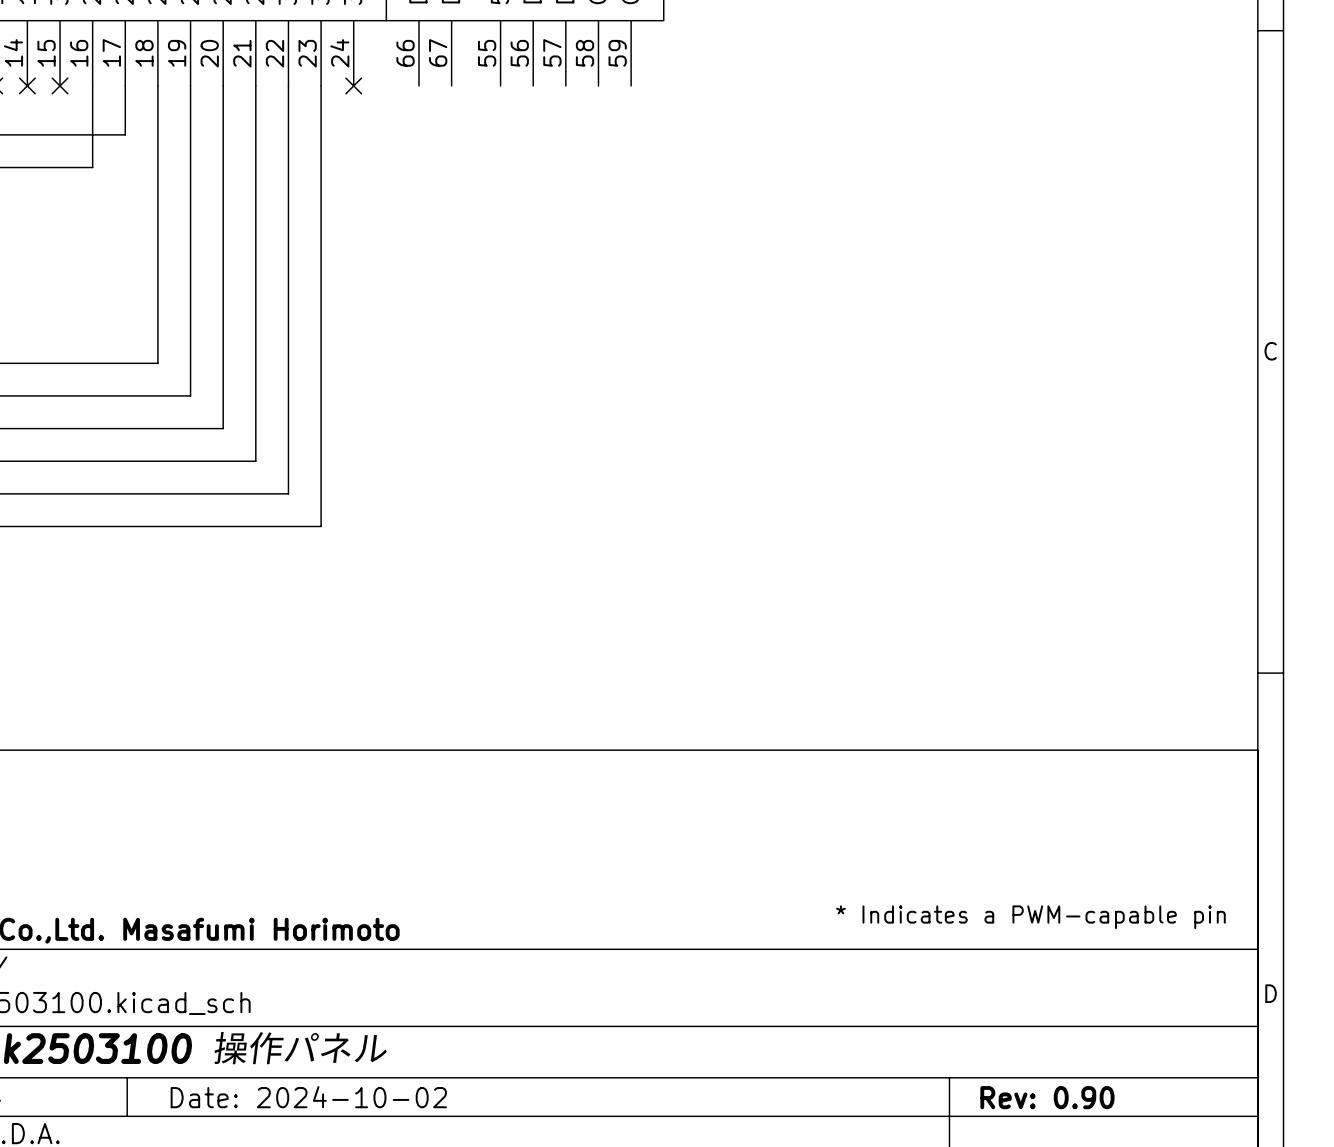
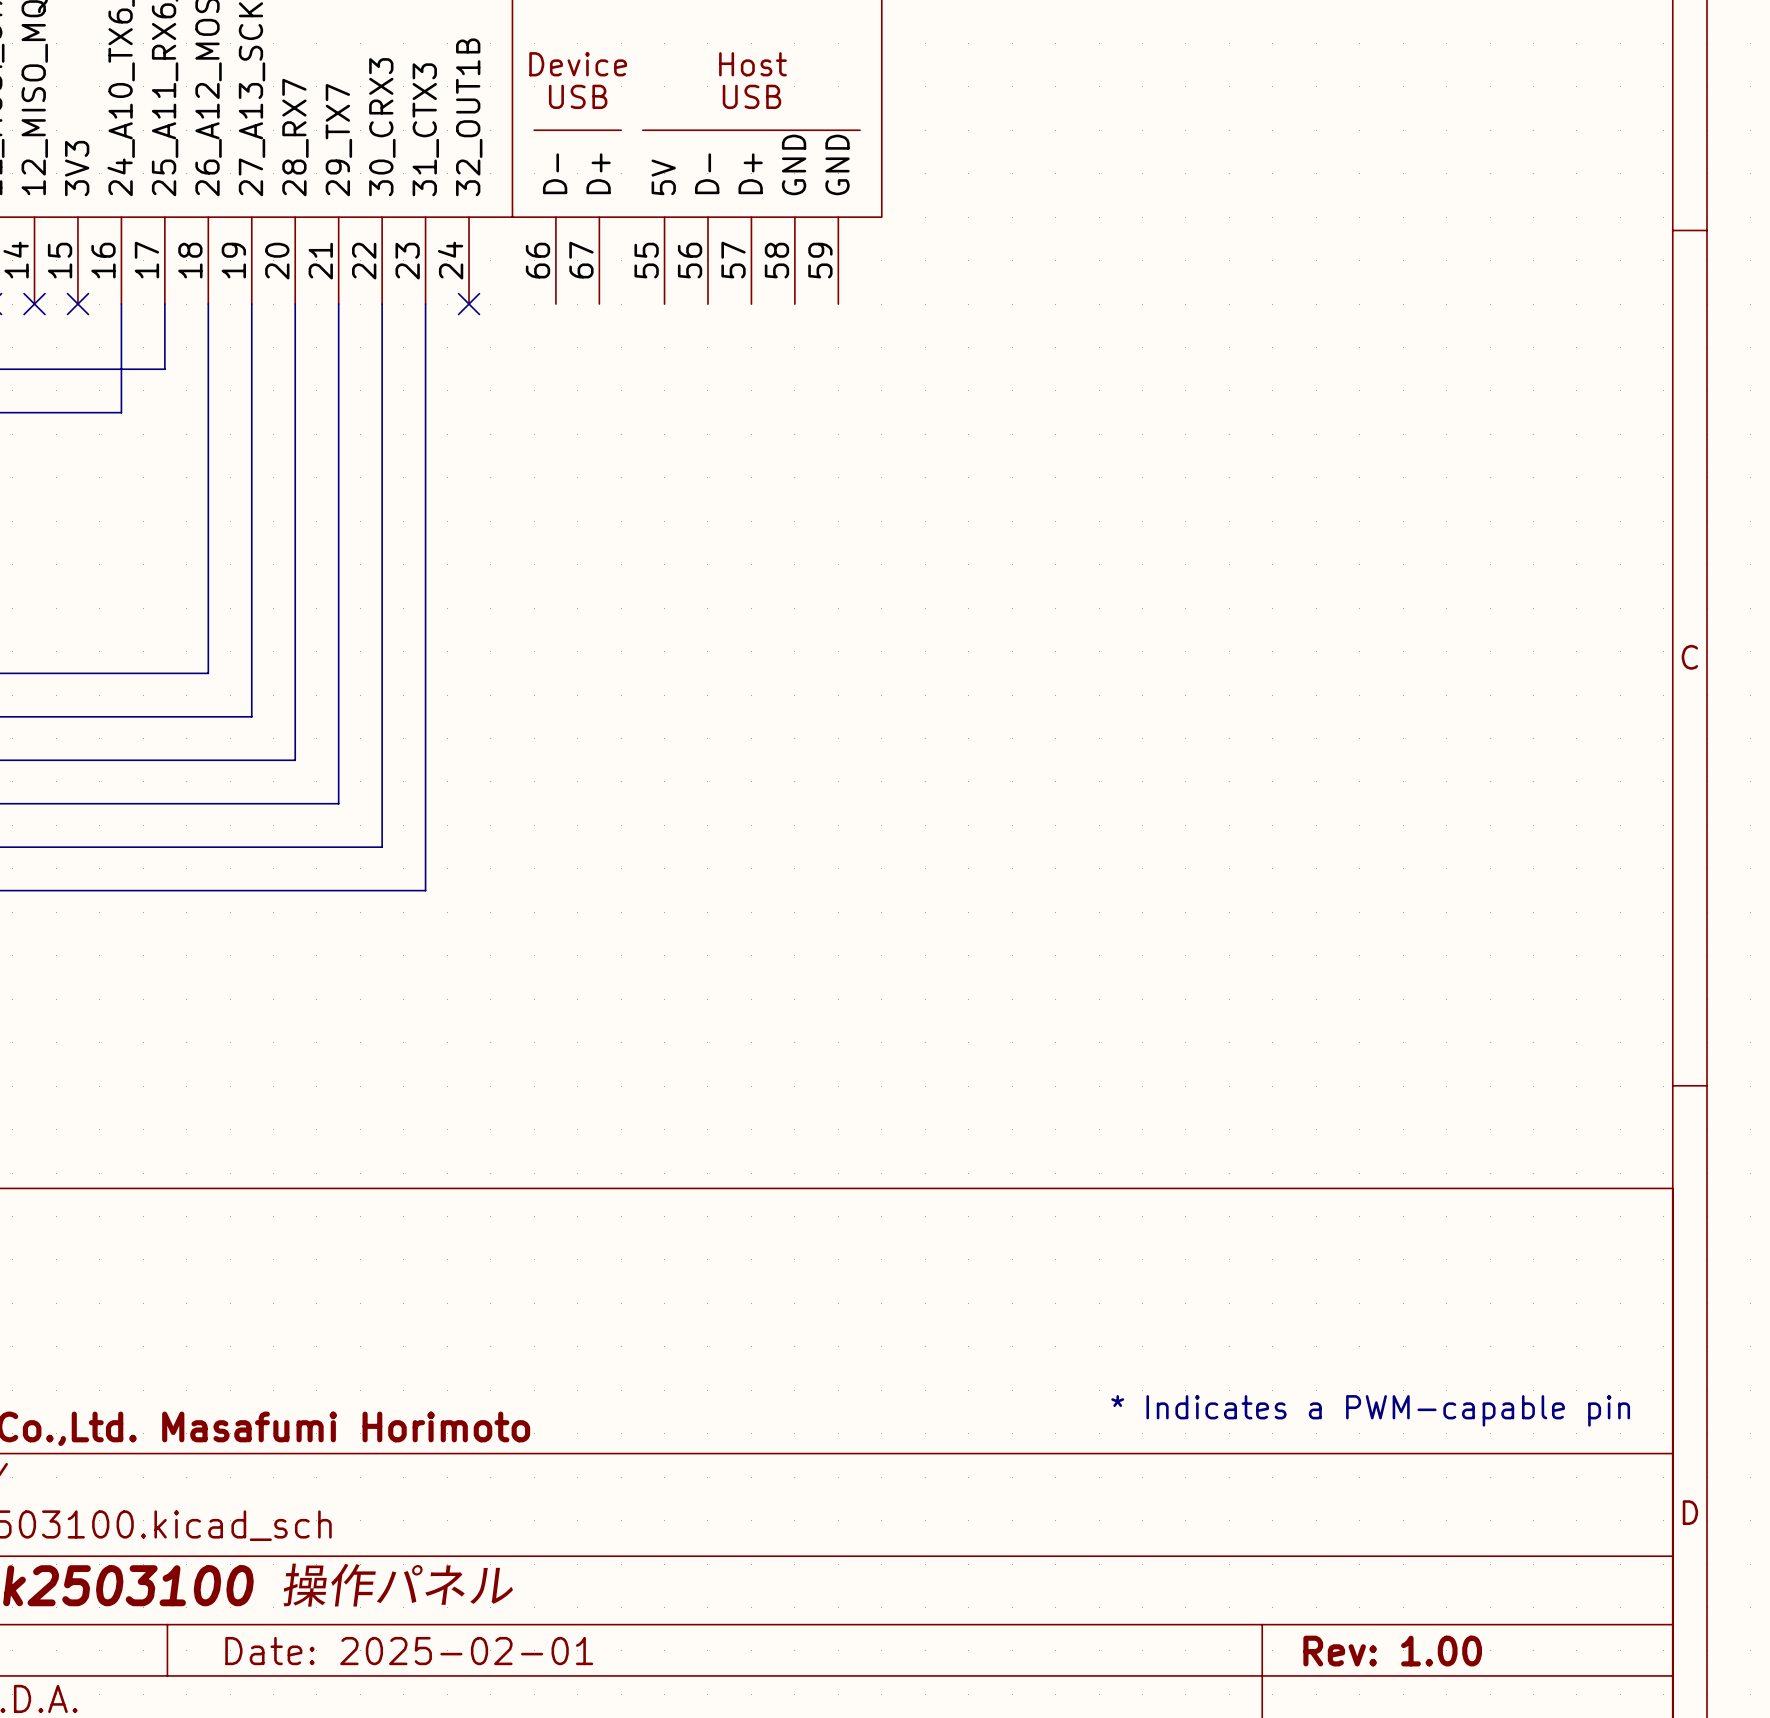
title block: Date: 2024-10-02 (308, 1097) -> Date: 2025-02-01 (409, 1651)
title block: Rev: 0.90 (1047, 1097) -> Rev: 1.00 (1392, 1651)

